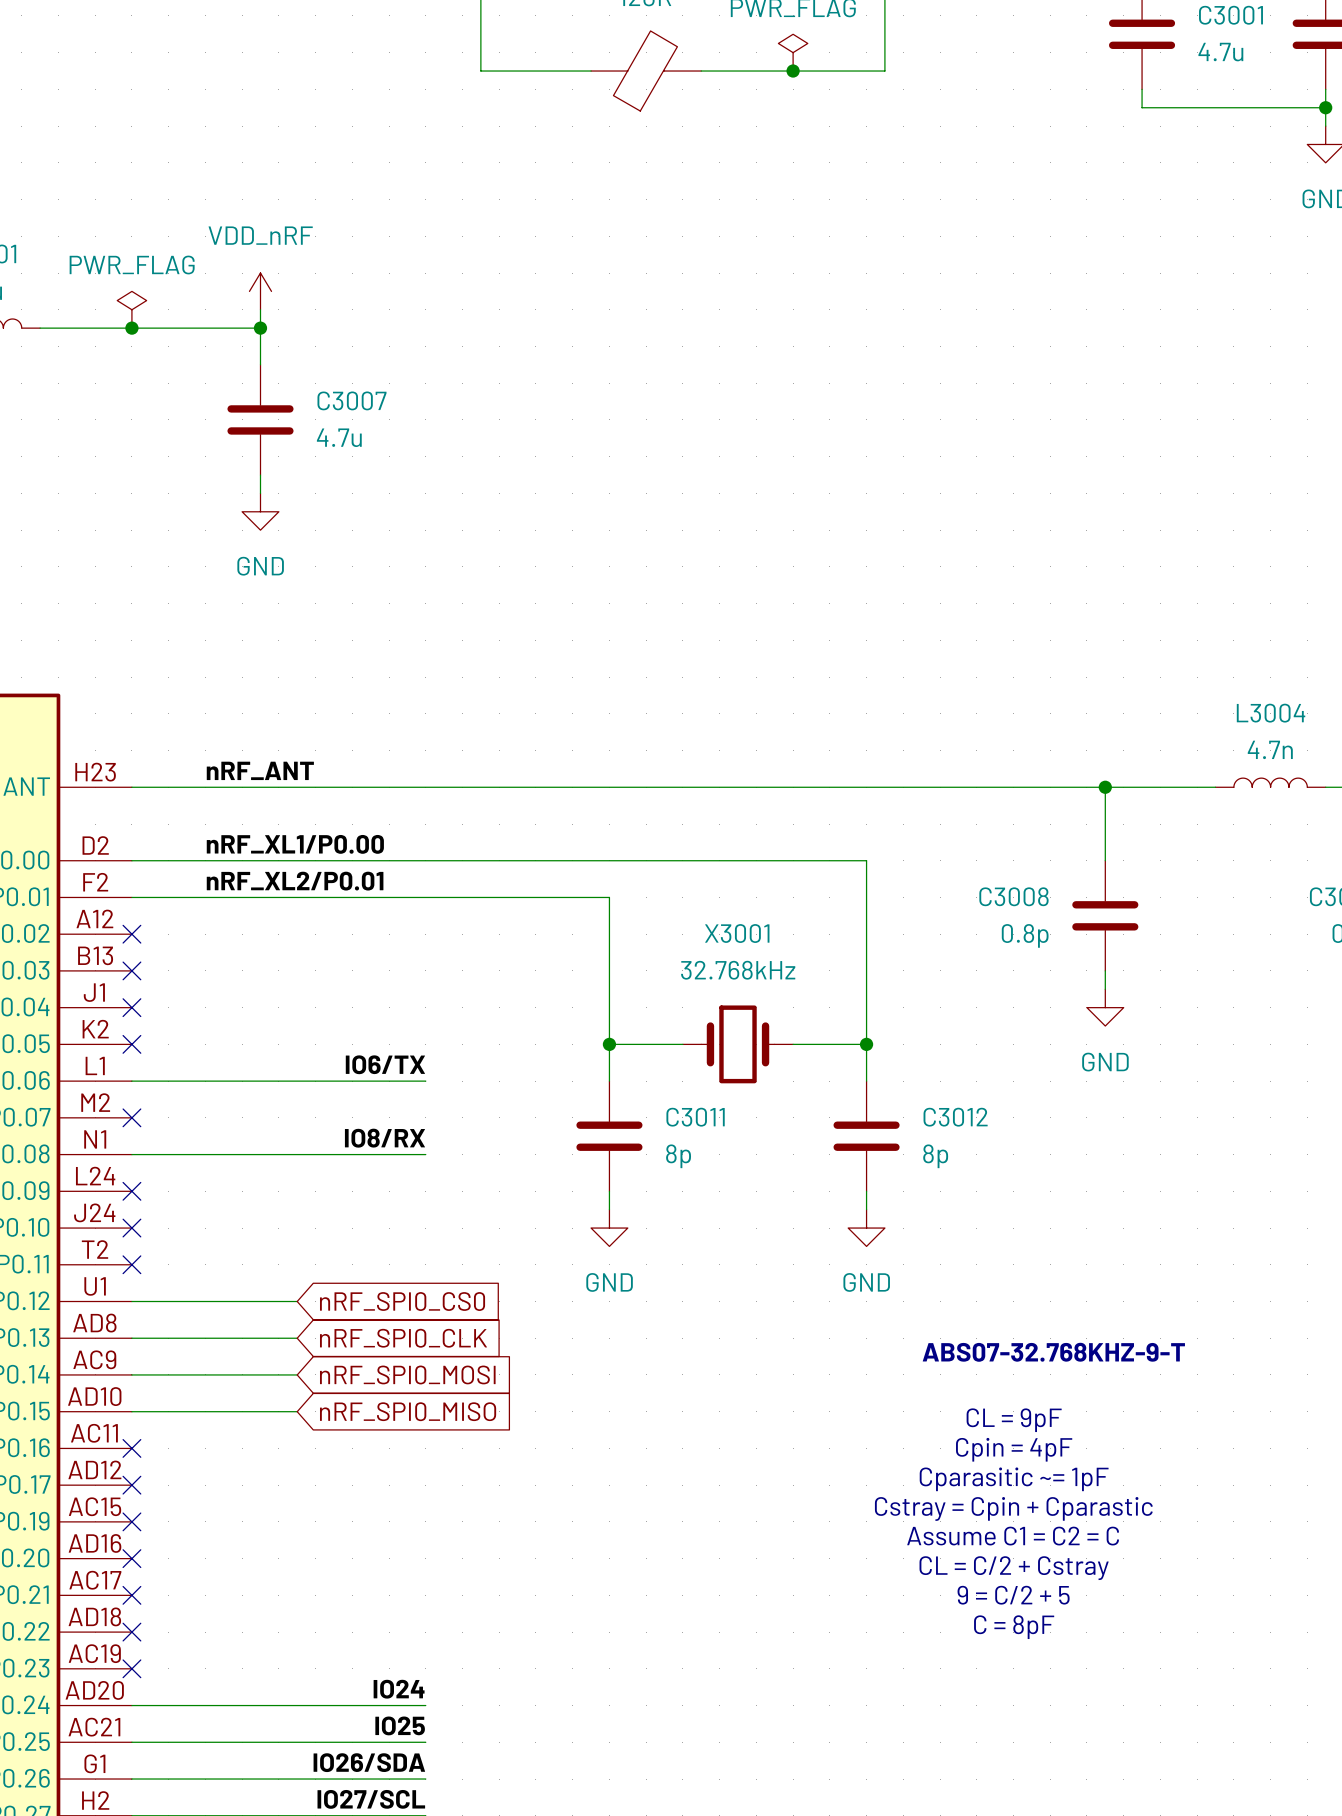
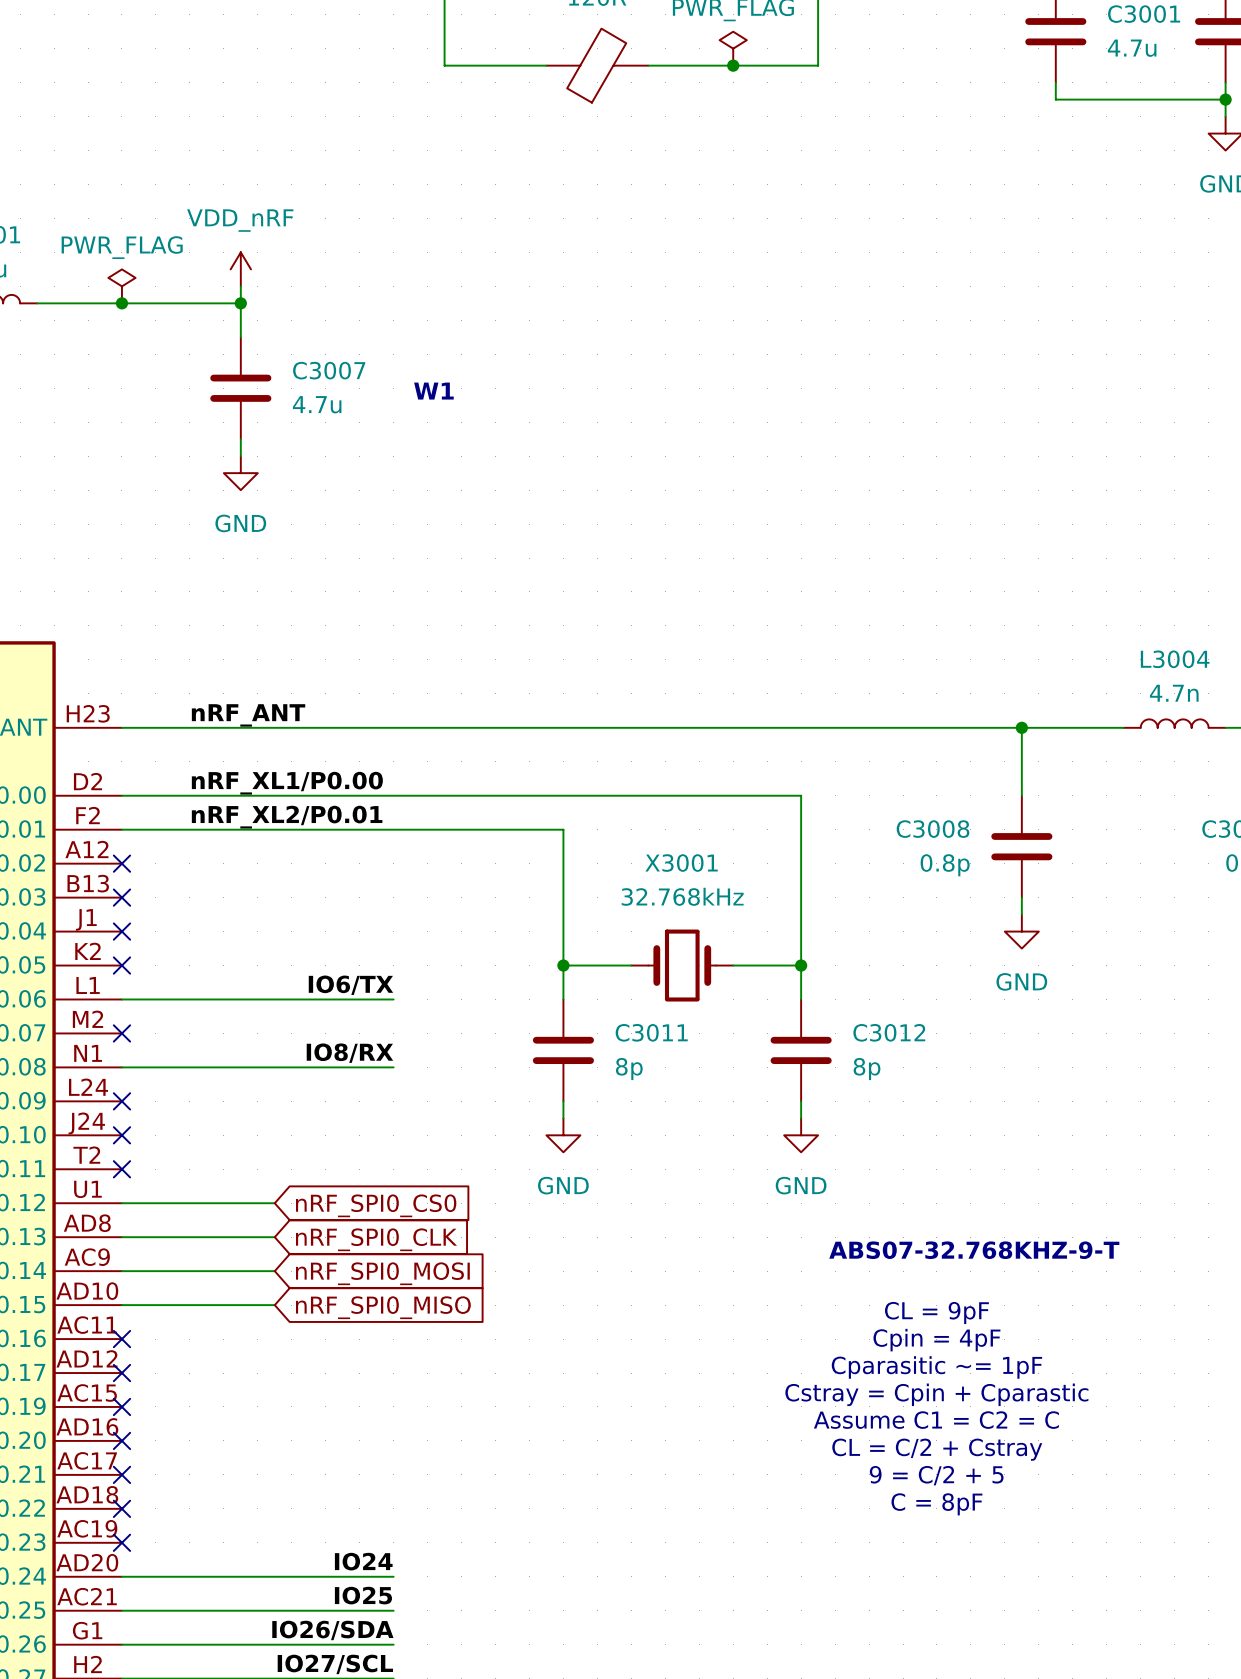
text: none -> W1 (433, 391)

